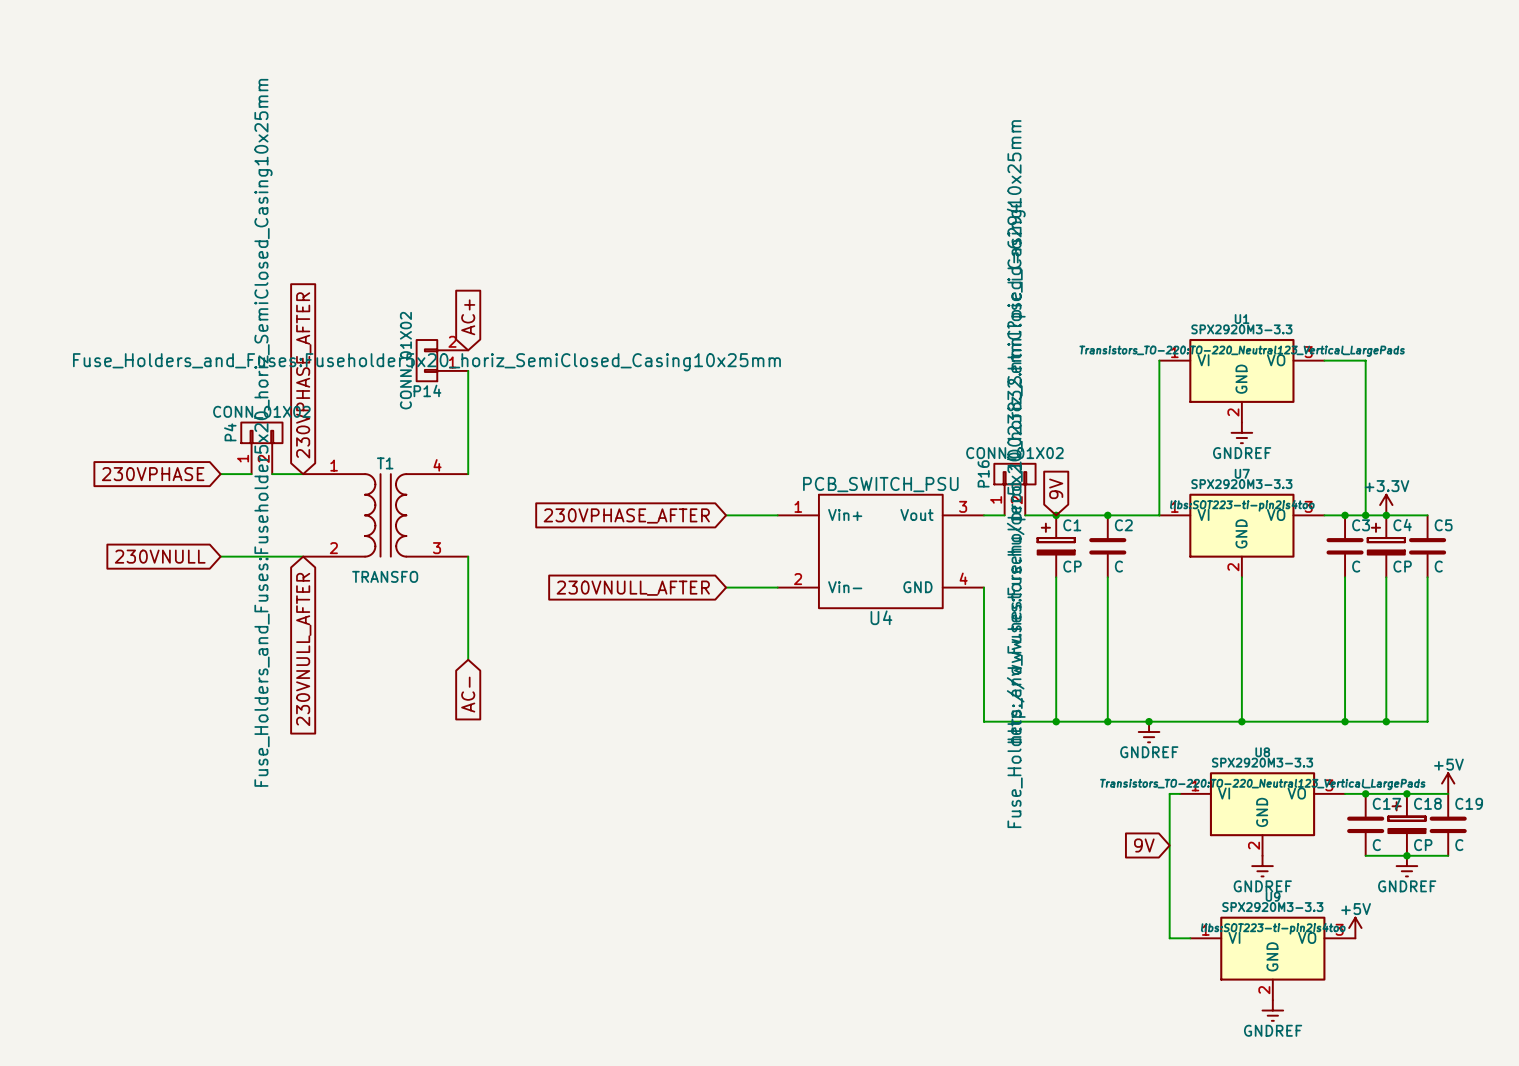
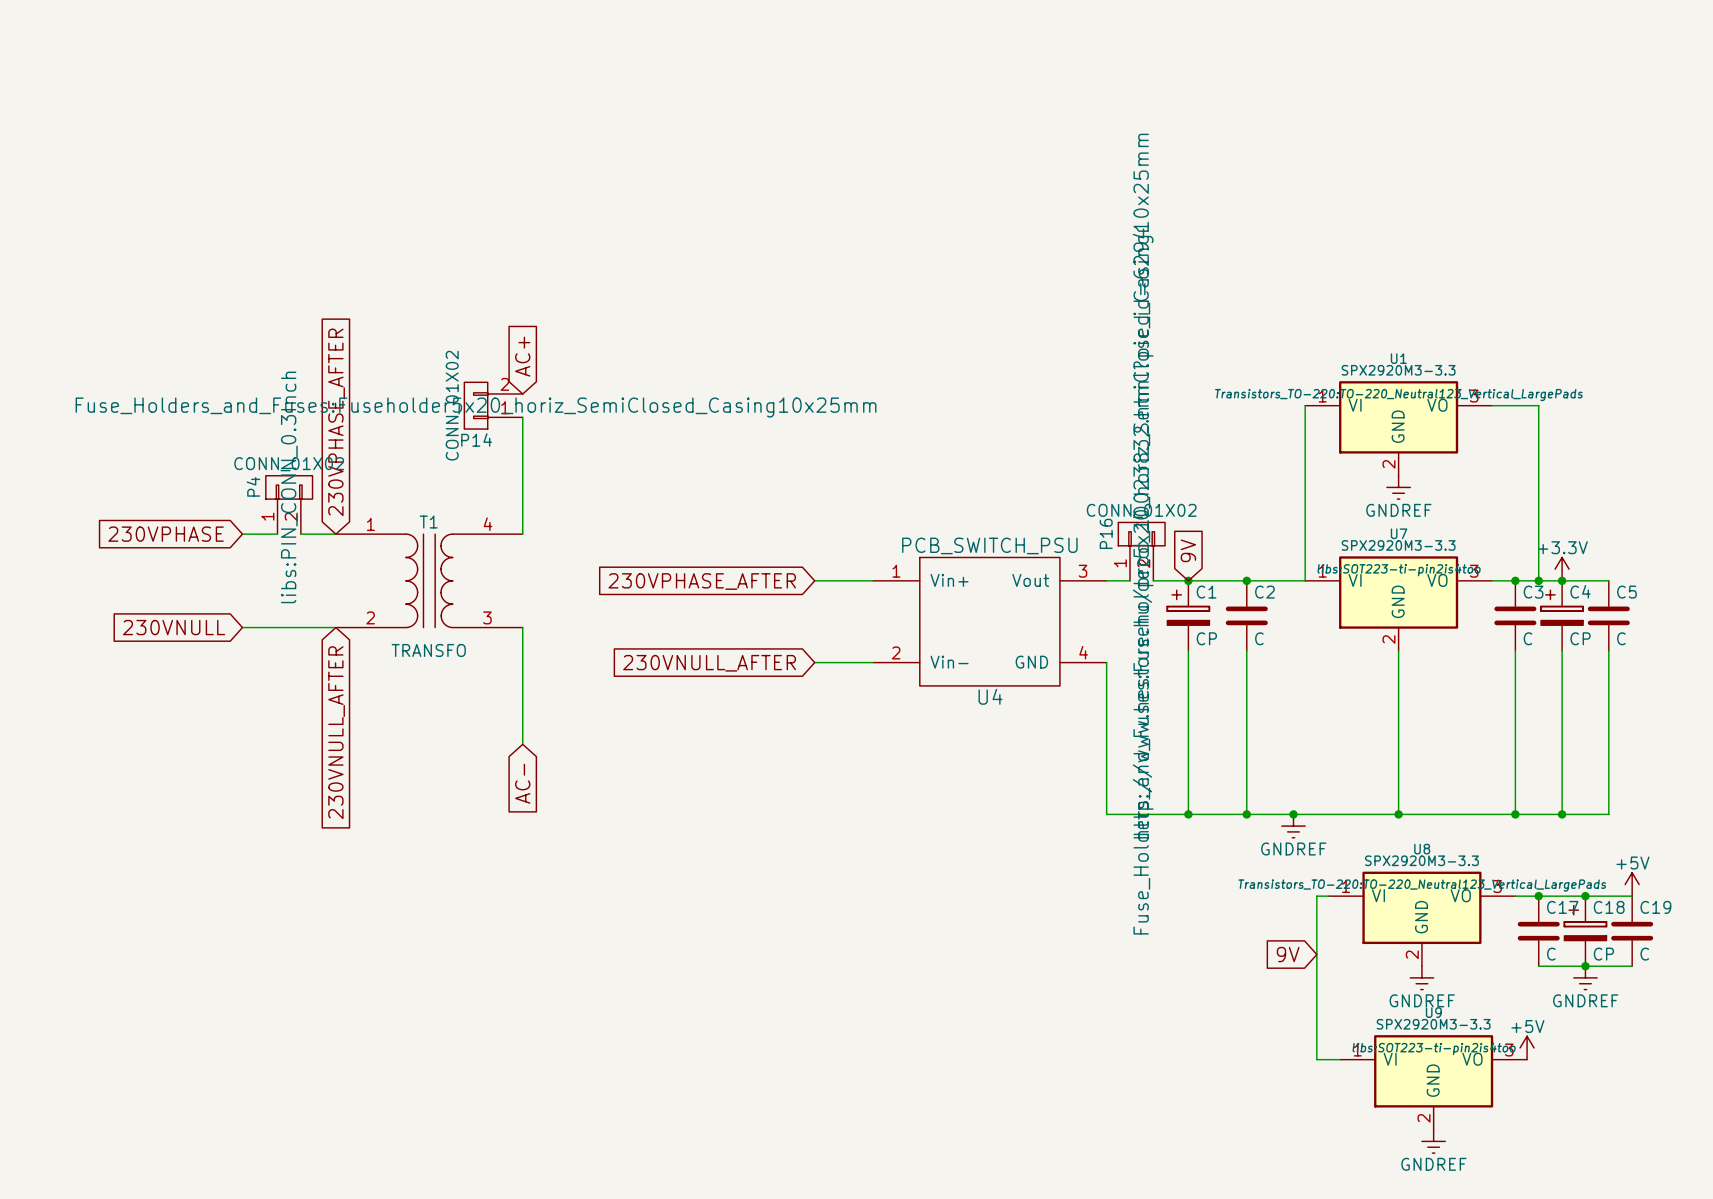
P4 text: Fuse_Holders_and_Fuses:Fuseholder5x20_horiz_SemiClosed_Casing10x25mm (263, 432) -> libs:PIN_CONN_0.3Inch (289, 487)

